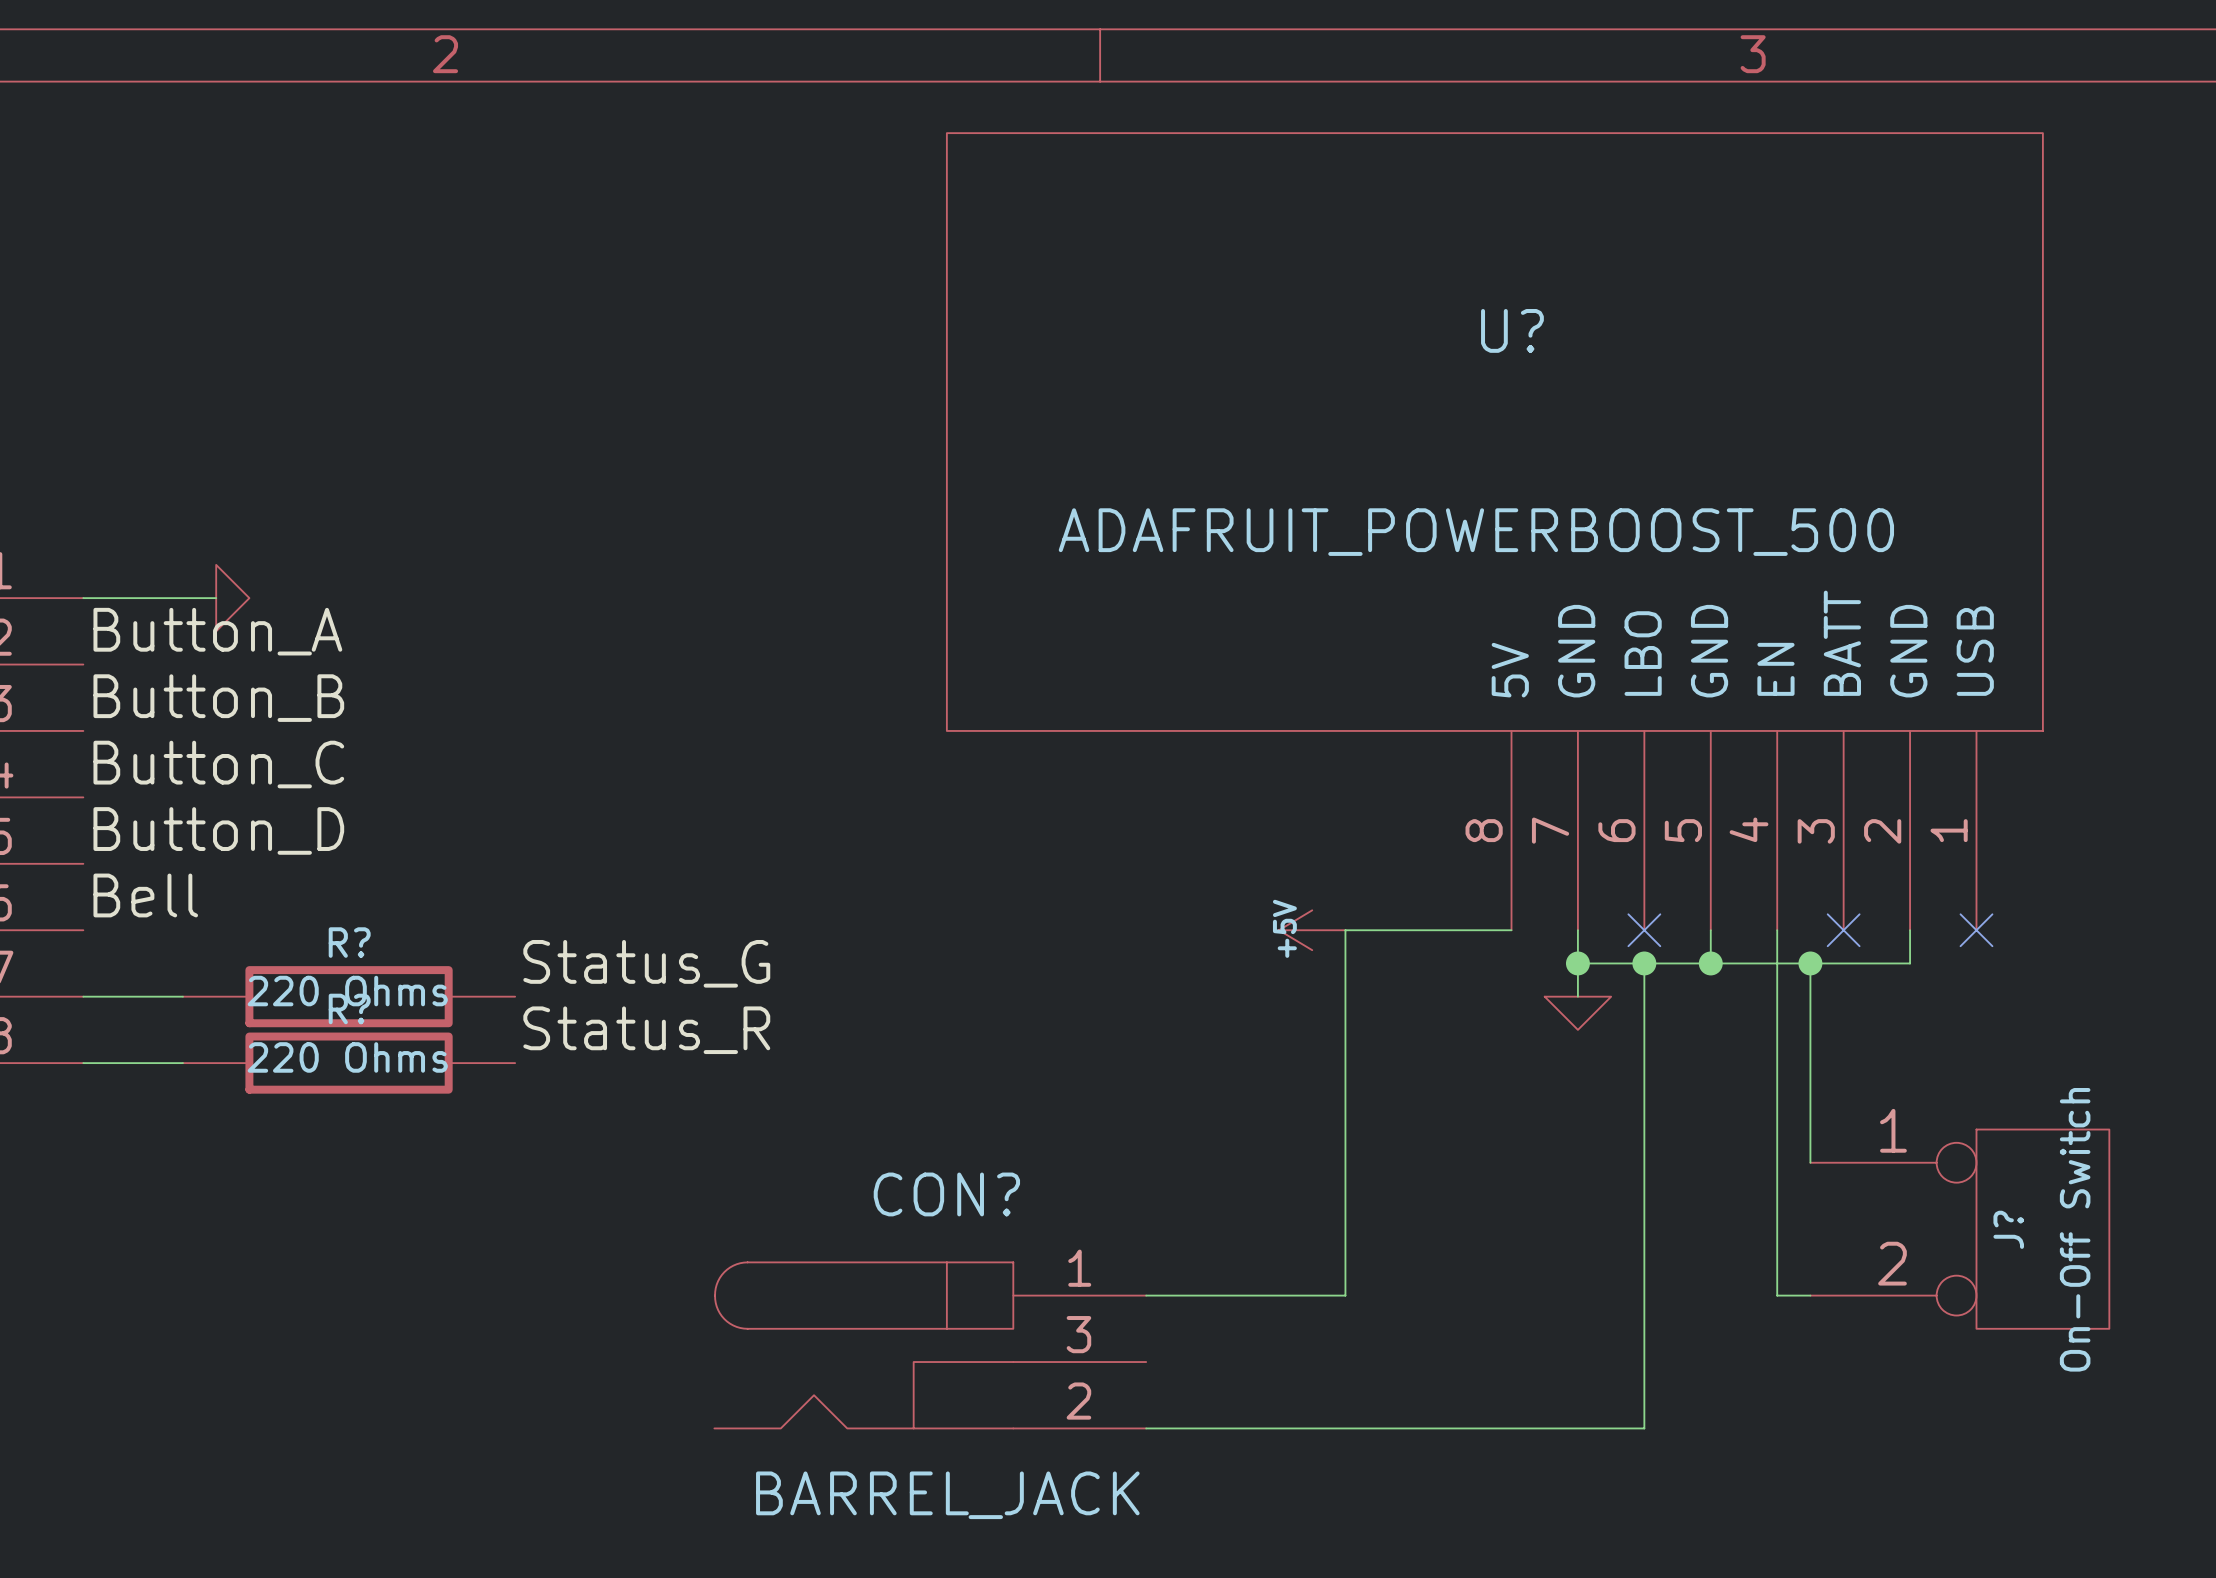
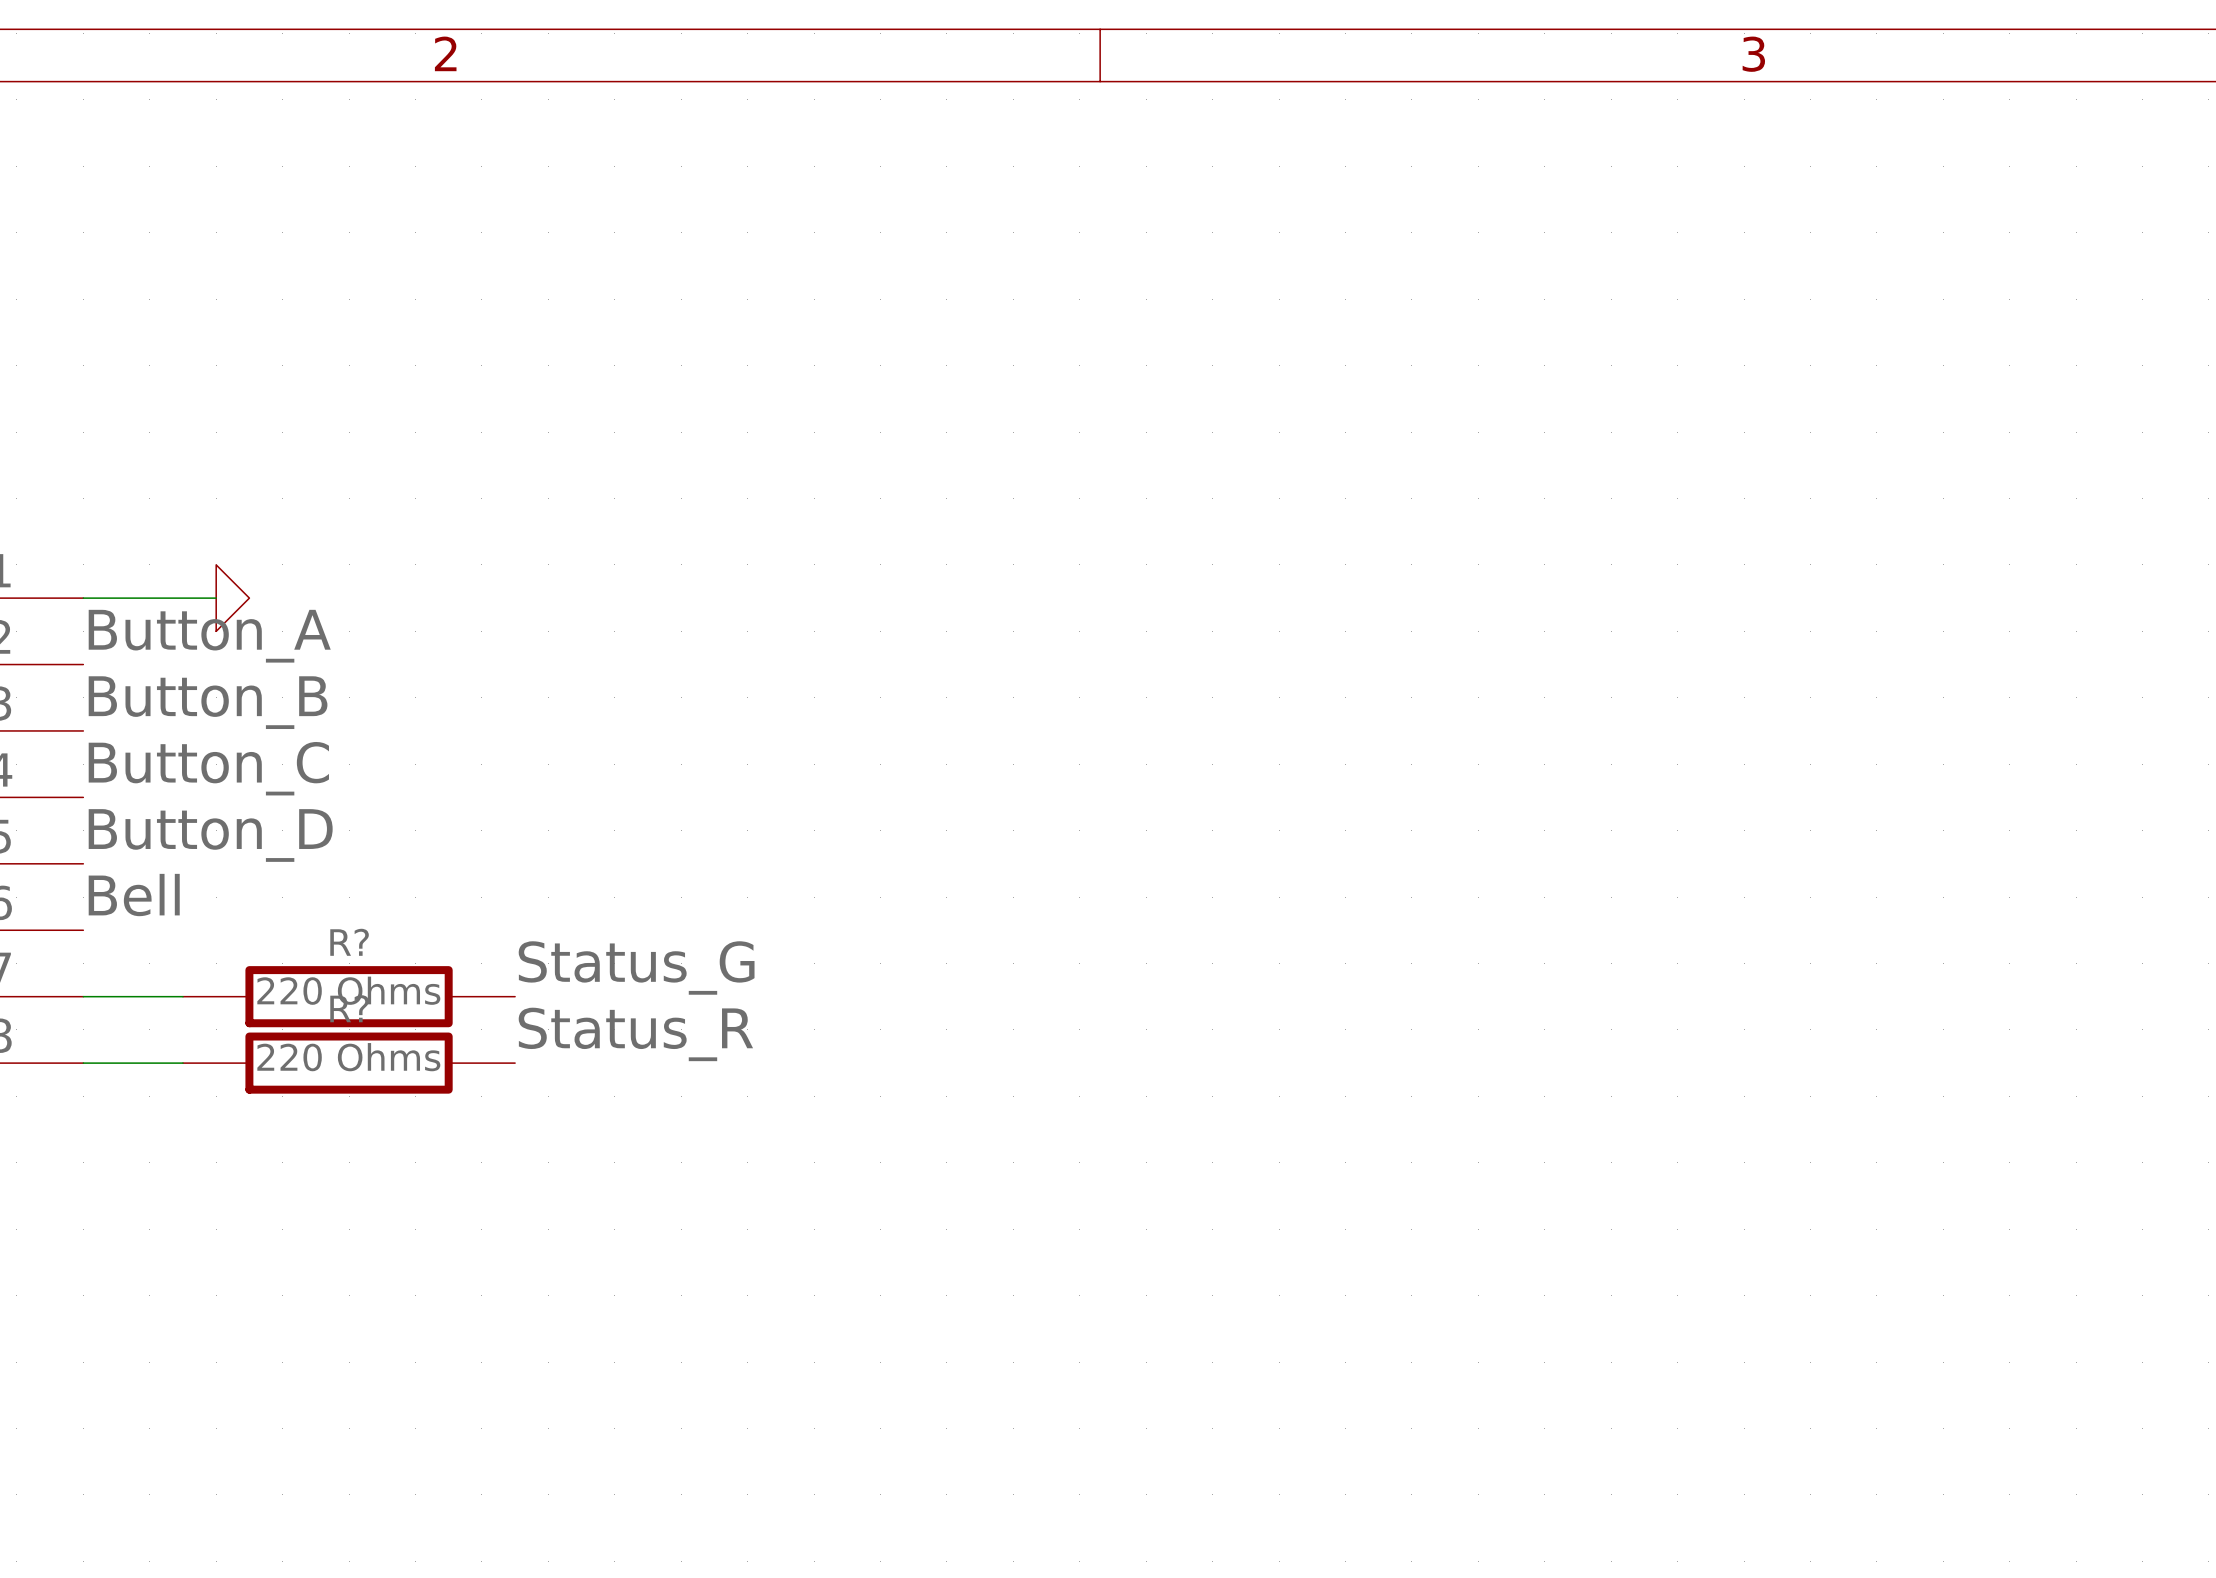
U?: ADAFRUIT_POWERBOOST_500 (1494, 531) -> none
power symbol: +5V (1312, 930) -> none
wire: (1511, 930) (1345, 930) (1345, 1295) (1146, 1295) -> none
wire: (1577, 930) (1577, 996) -> none
no-connect mark: (1644, 930) -> none
wire: (1710, 930) (1710, 963) -> none
wire: (1777, 930) (1777, 1295) (1810, 1295) -> none
no-connect mark: (1843, 930) -> none
wire: (1910, 930) (1910, 963) (1577, 963) -> none
no-connect mark: (1976, 930) -> none
junction: (1577, 963) -> none
wire: (1644, 963) (1644, 1428) (1146, 1428) -> none
junction: (1644, 963) -> none
junction: (1710, 963) -> none
wire: (1810, 963) (1810, 1162) -> none
junction: (1810, 963) -> none
power symbol: (1577, 1013) -> none
J?: On-Off Switch (1959, 1229) -> none
CON?: BARREL_JACK (930, 1345) -> none

